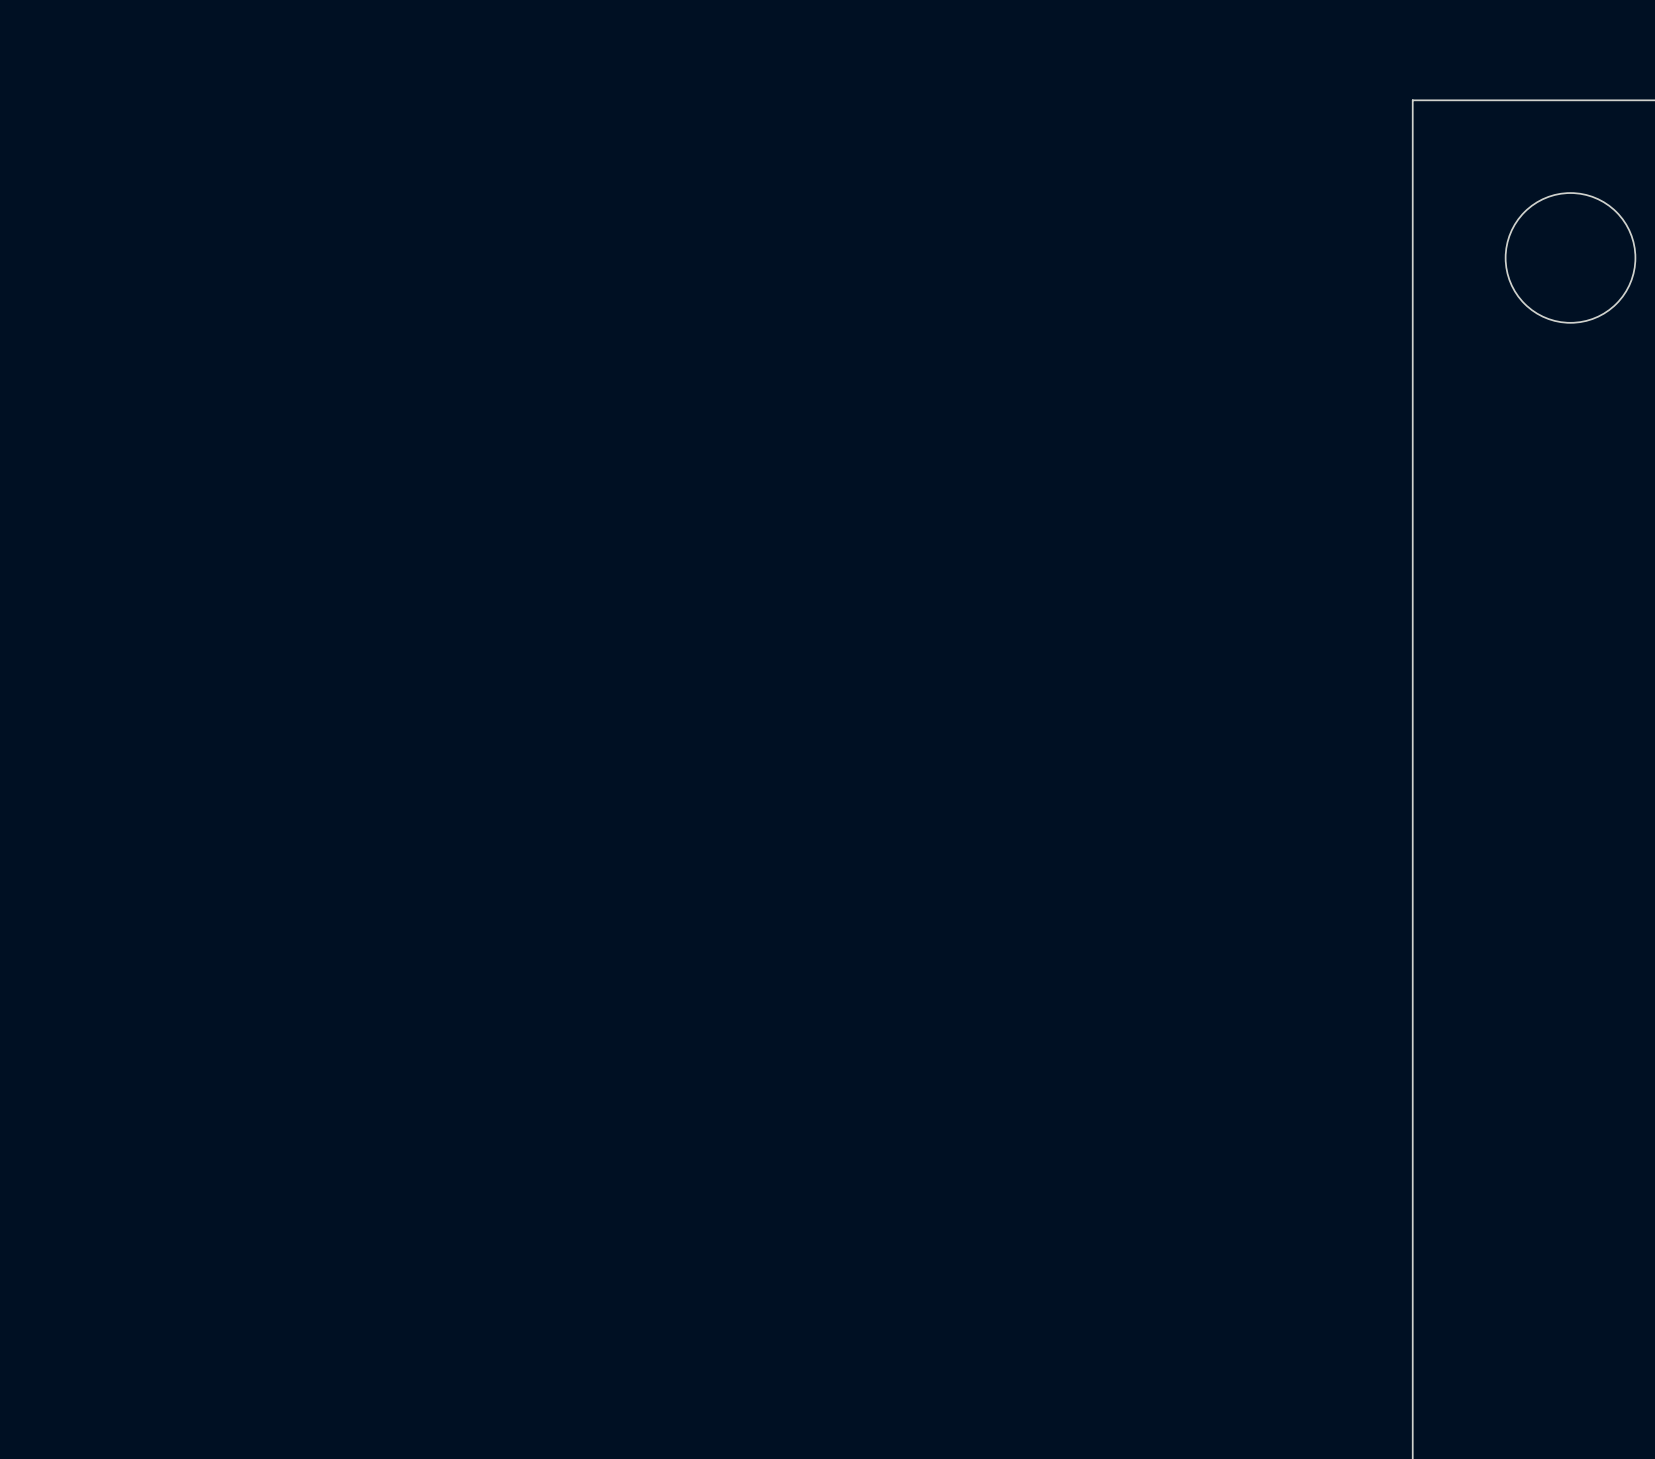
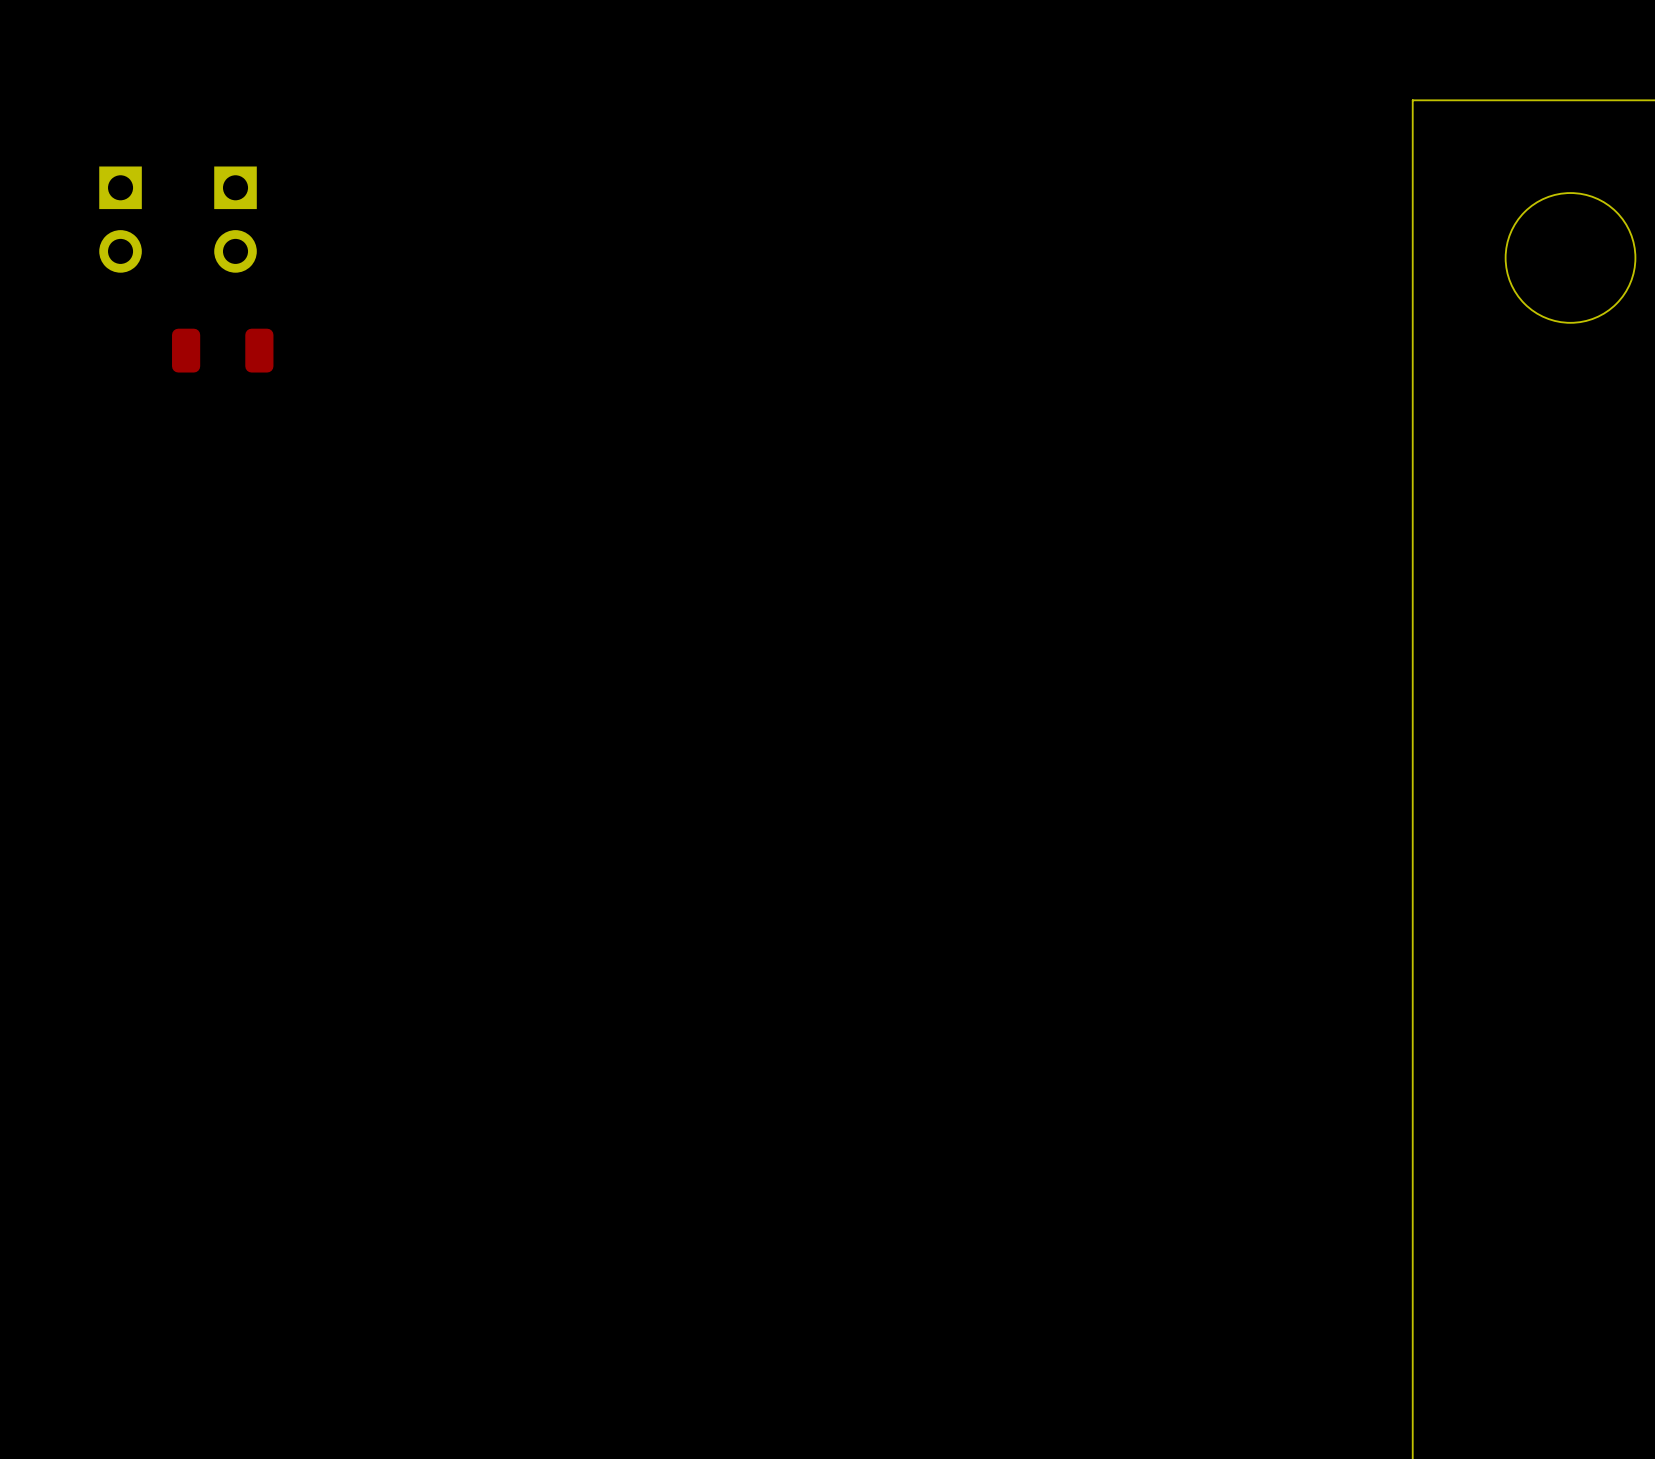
part: none -> (120, 219)
part: none -> (235, 219)
part: none -> (222, 350)

